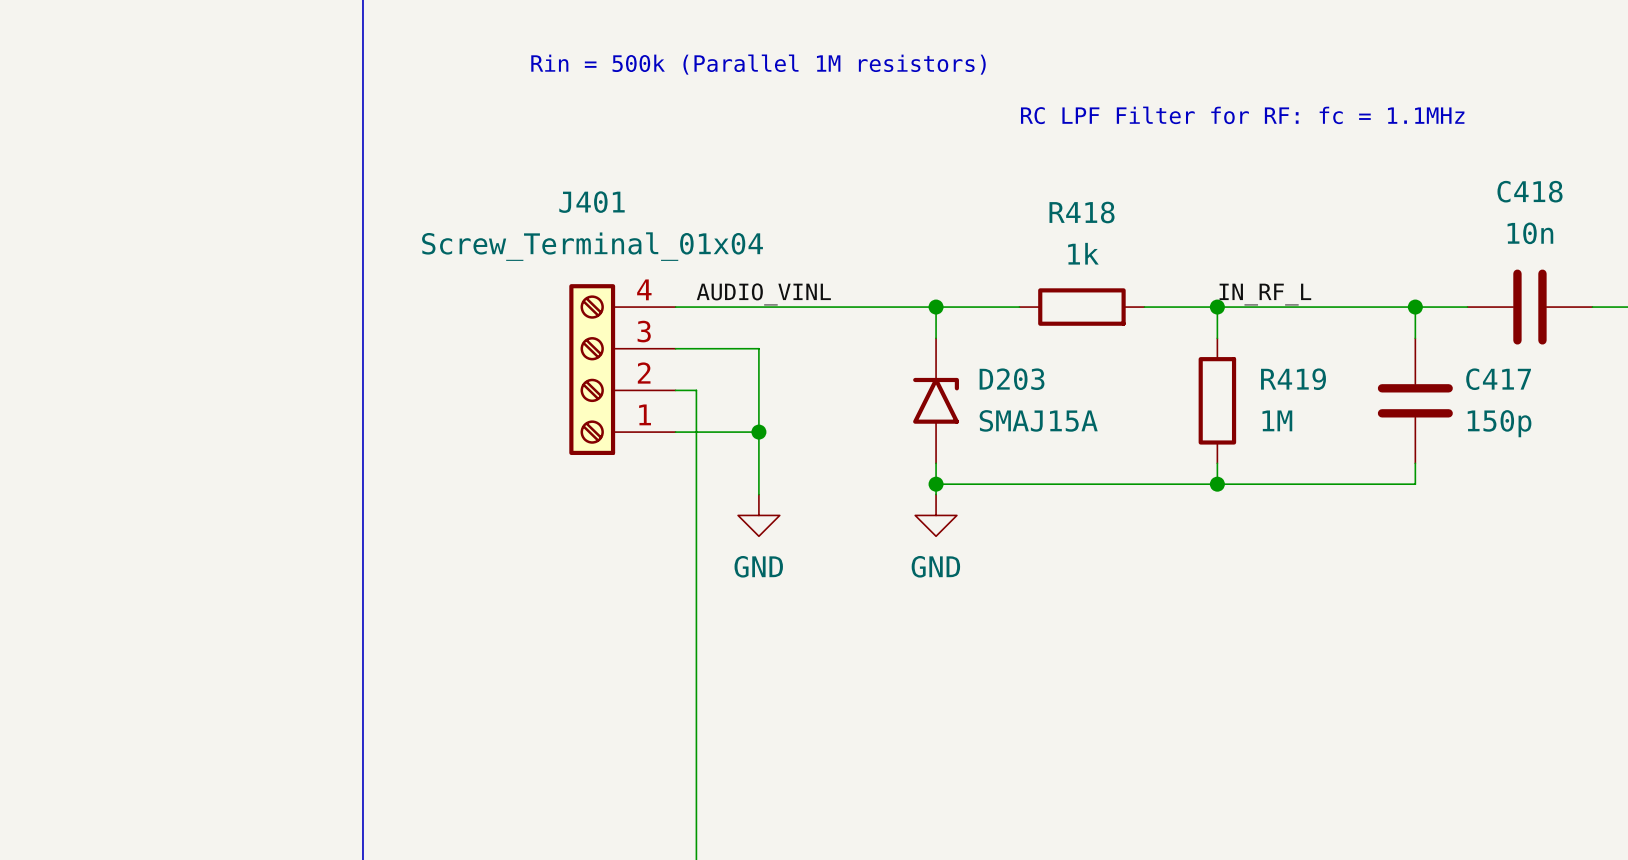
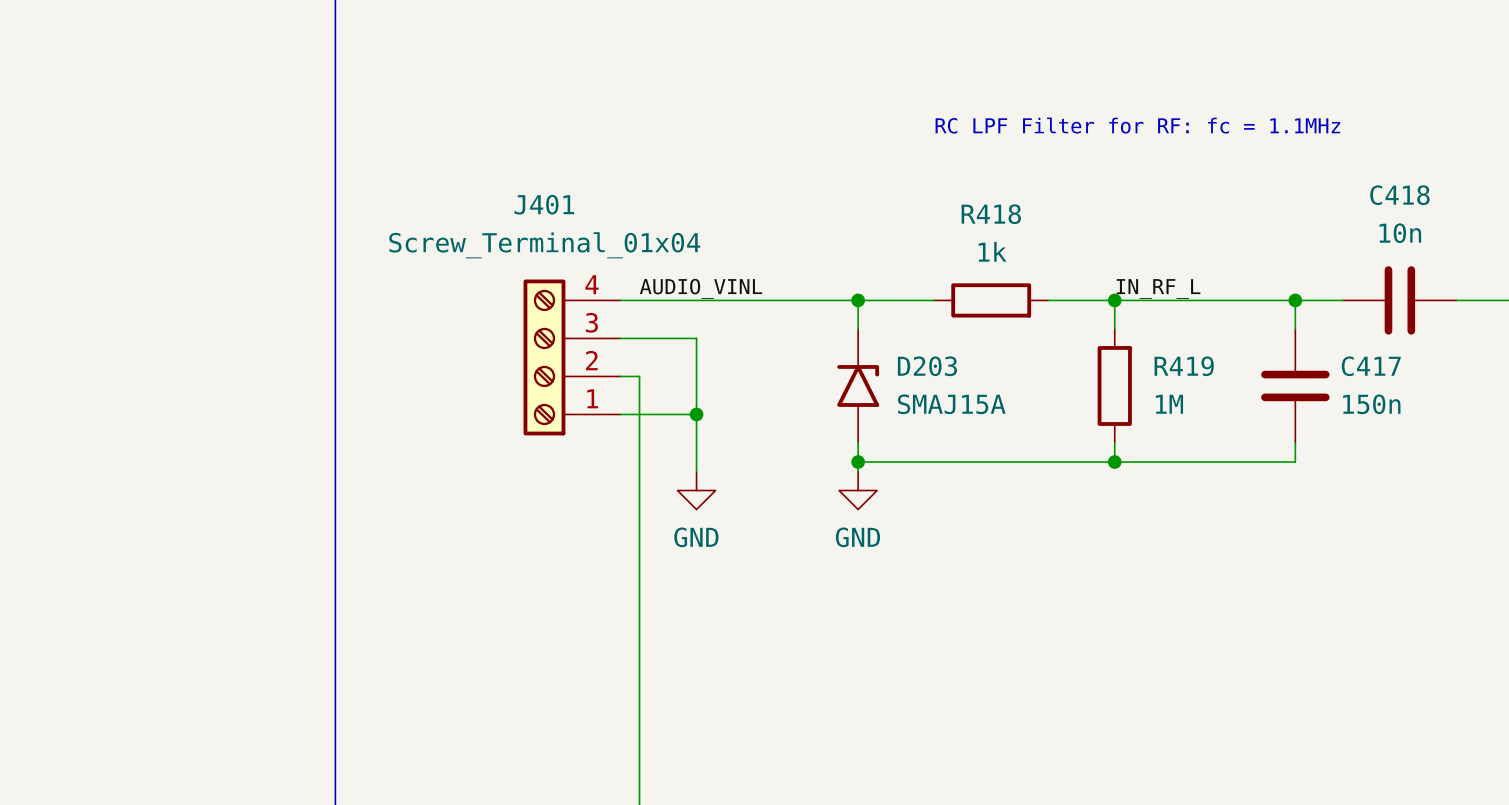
text: Rin = 500k (Parallel 1M resistors) (758, 64) -> none
C417 value: 150p (1499, 423) -> 150n (1371, 404)

